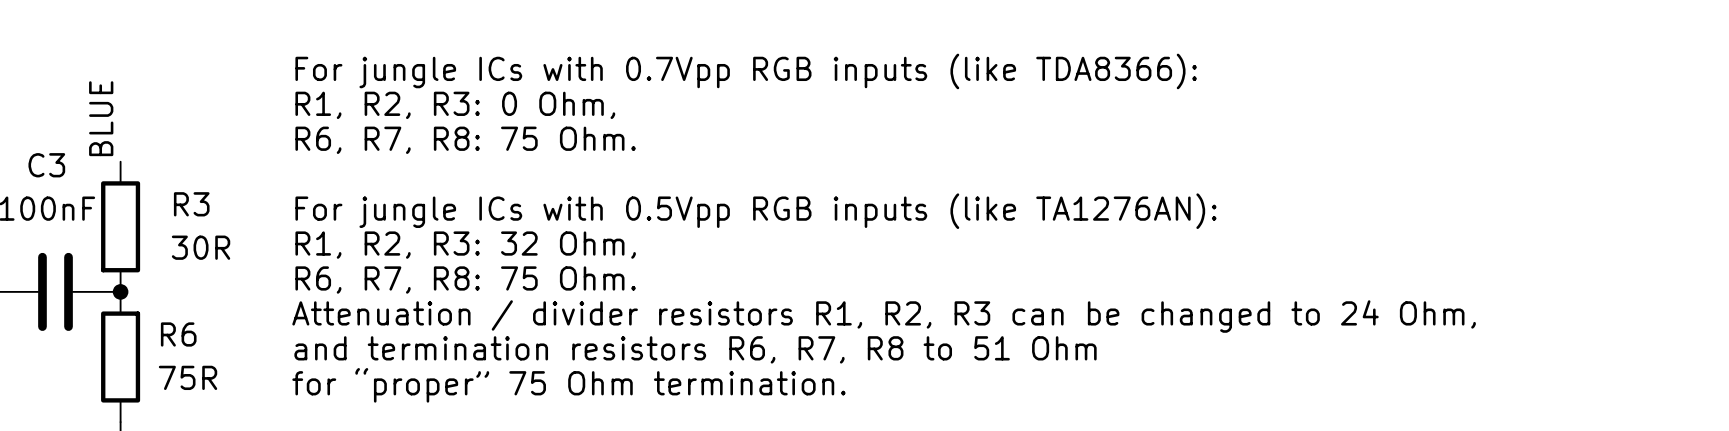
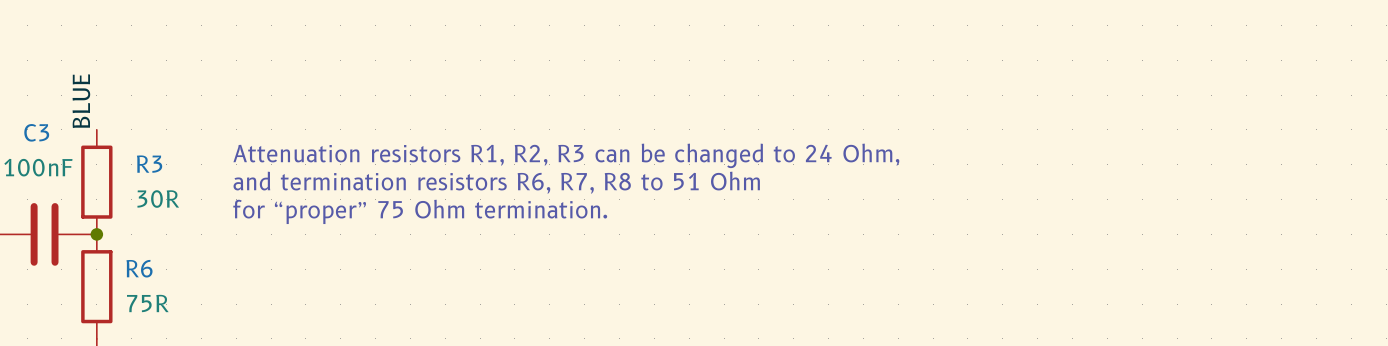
text: For jungle ICs with 0.7Vpp RGB inputs (like TDA8366): (746, 71) -> none
text: R1, R2, R3: 0 Ohm, (455, 105) -> none
text: R6, R7, R8: 75 Ohm. (465, 140) -> none
text: none -> Attenuation resistors R1, R2, R3 can be changed to 24 Ohm, (566, 155)
text: For jungle ICs with 0.5Vpp RGB inputs (like TA1276AN): (755, 211) -> none
text: R1, R2, R3: 32 Ohm, (465, 245) -> none
text: R6, R7, R8: 75 Ohm. (465, 280) -> none
text: Attenuation / divider resistors R1, R2, R3 can be changed to 24 Ohm, (884, 316) -> none
text position: and termination resistors R6, R7, R8 to 51 Ohm (695, 349) -> and termination resistors R6, R7, R8 to 51 Ohm (496, 182)
text position: for “proper” 75 Ohm termination. (568, 385) -> for “proper” 75 Ohm termination. (420, 211)

